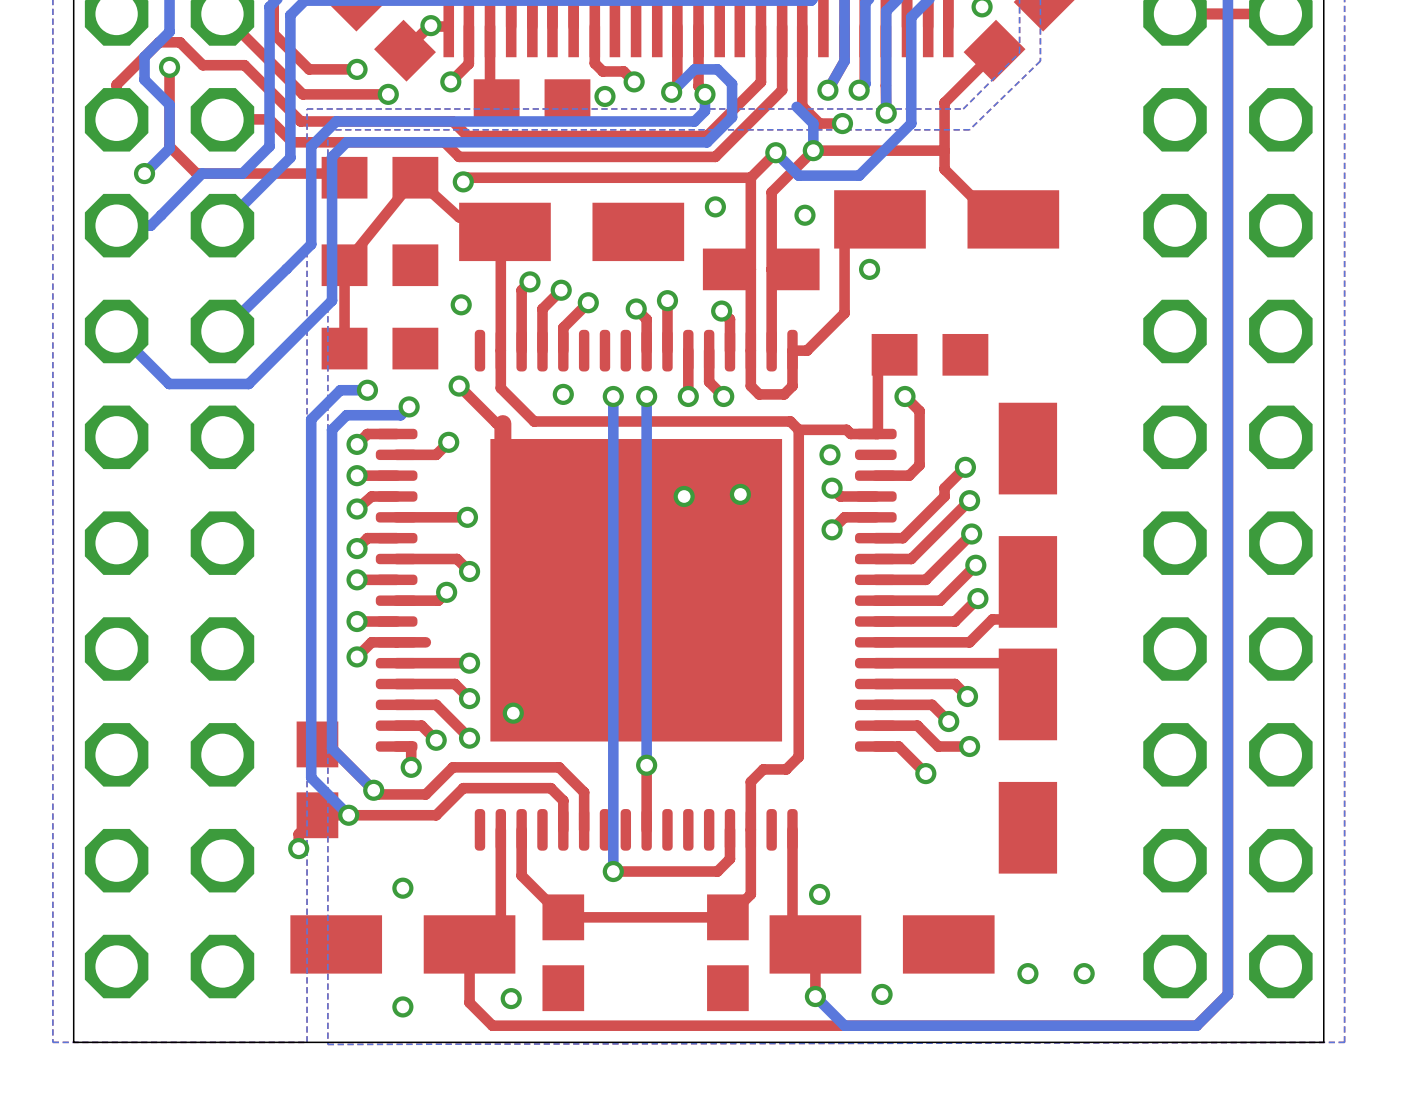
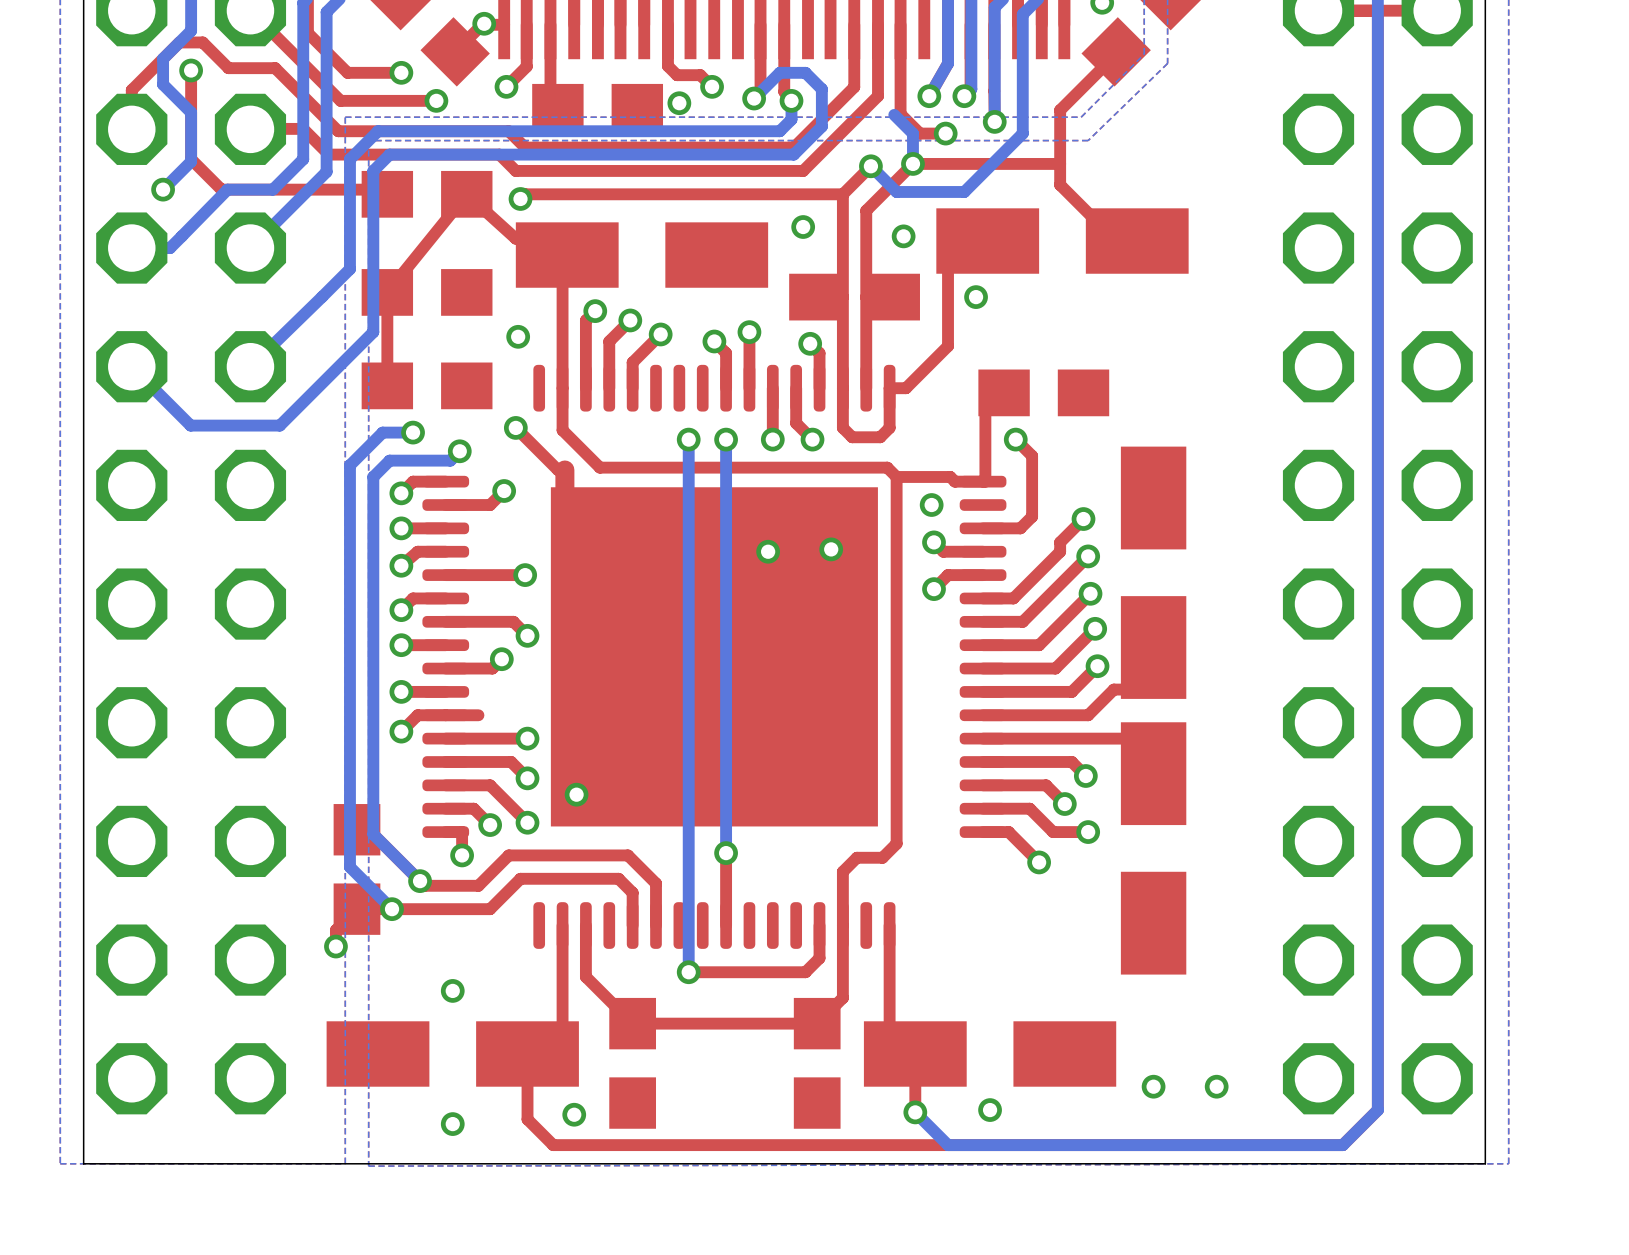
via: (563, 394) -> none
via: (819, 894) -> none

